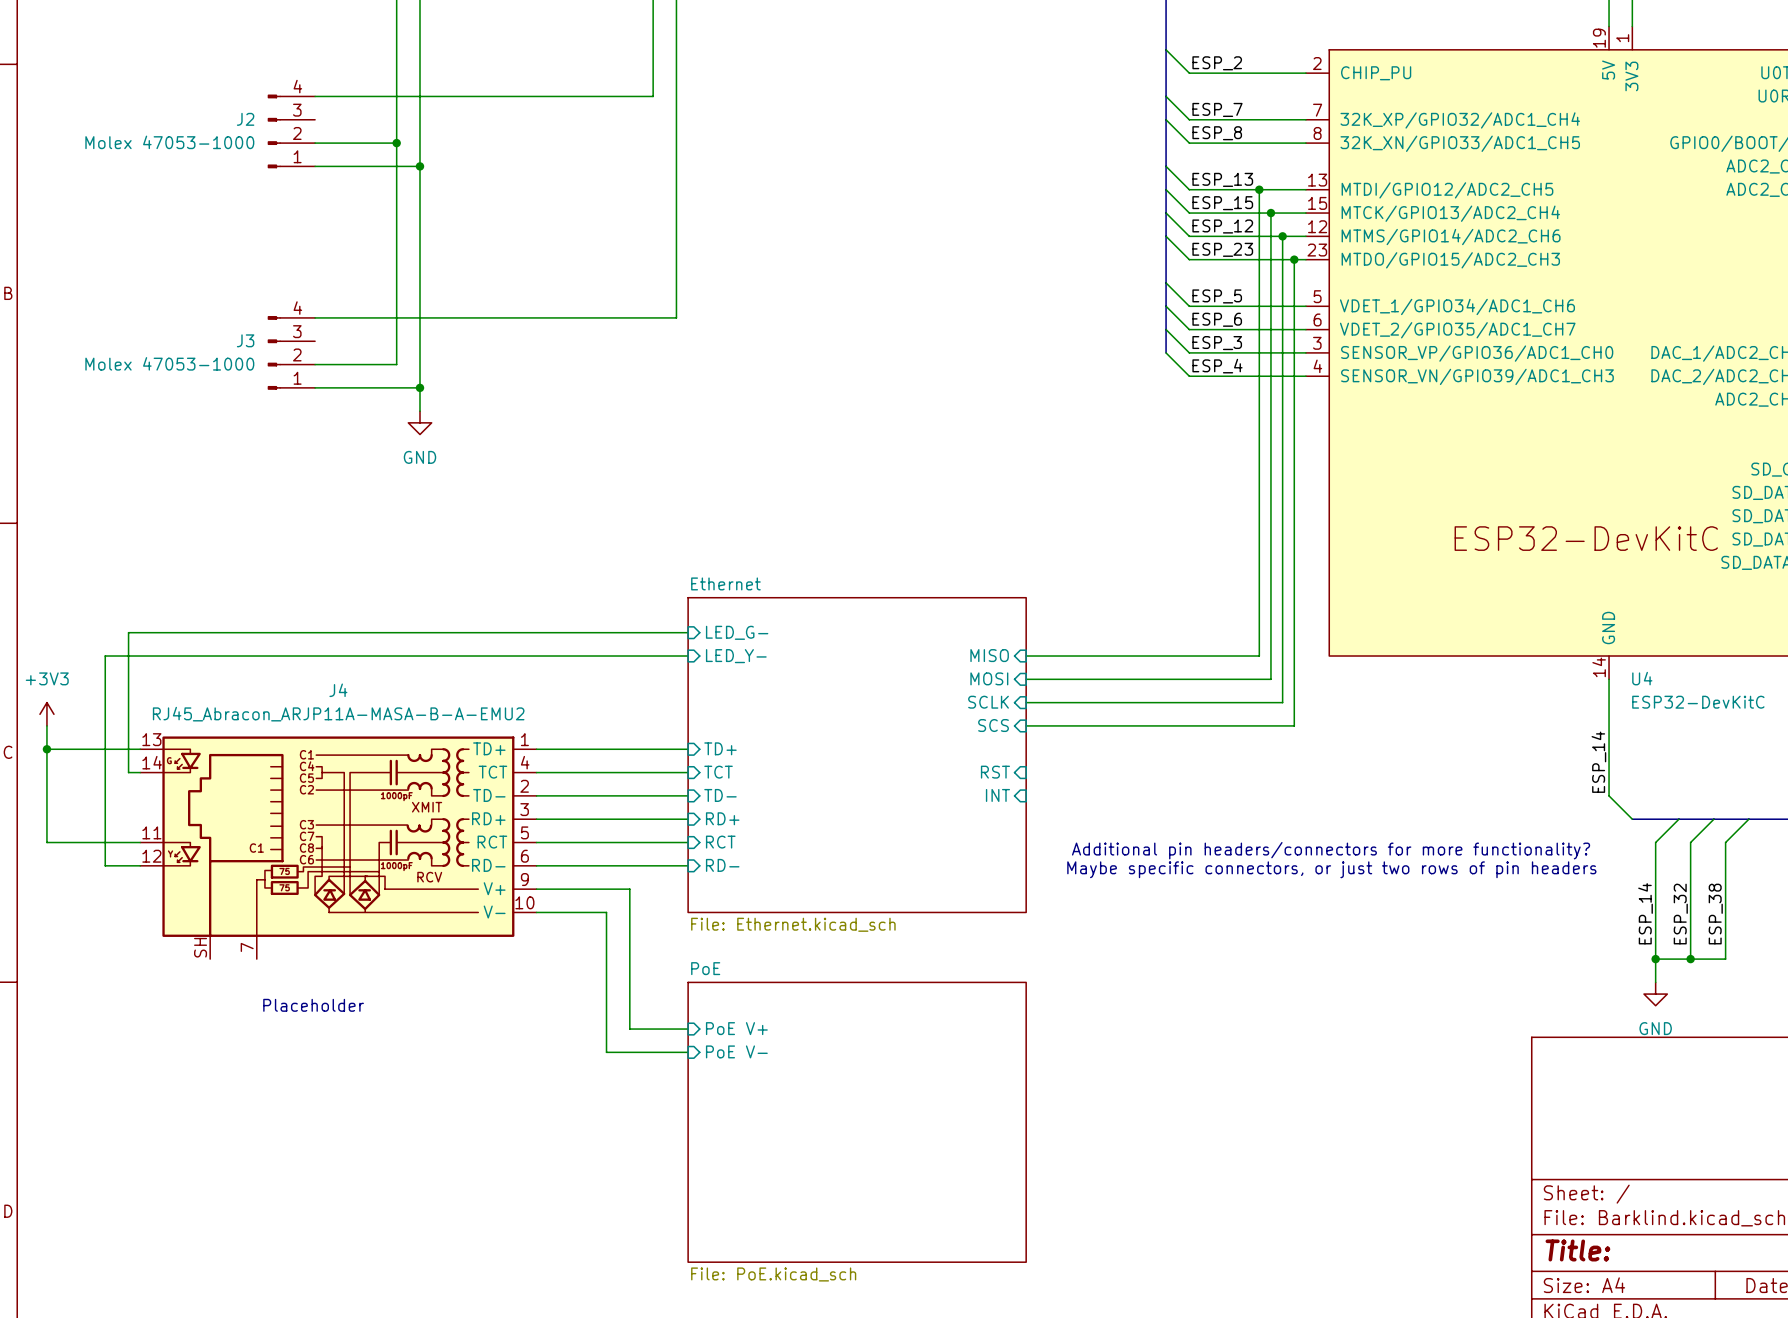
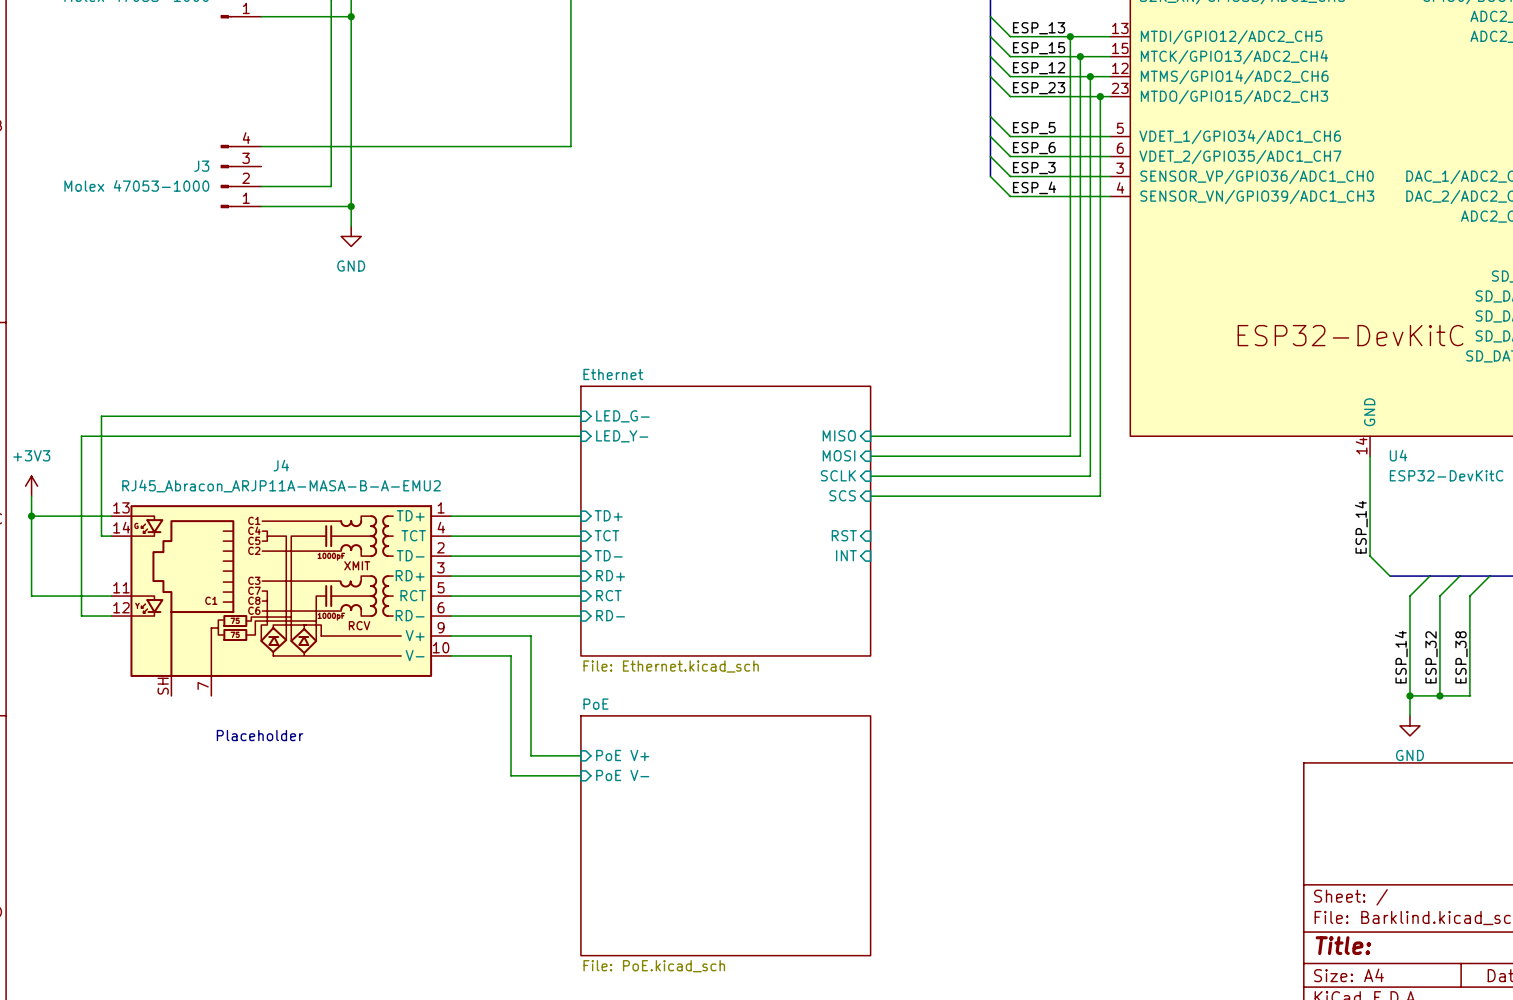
text: Additional pin headers/connectors for more functionality? (1331, 850) -> none
text: Maybe specific connectors, or just two rows of pin headers (1331, 869) -> none

